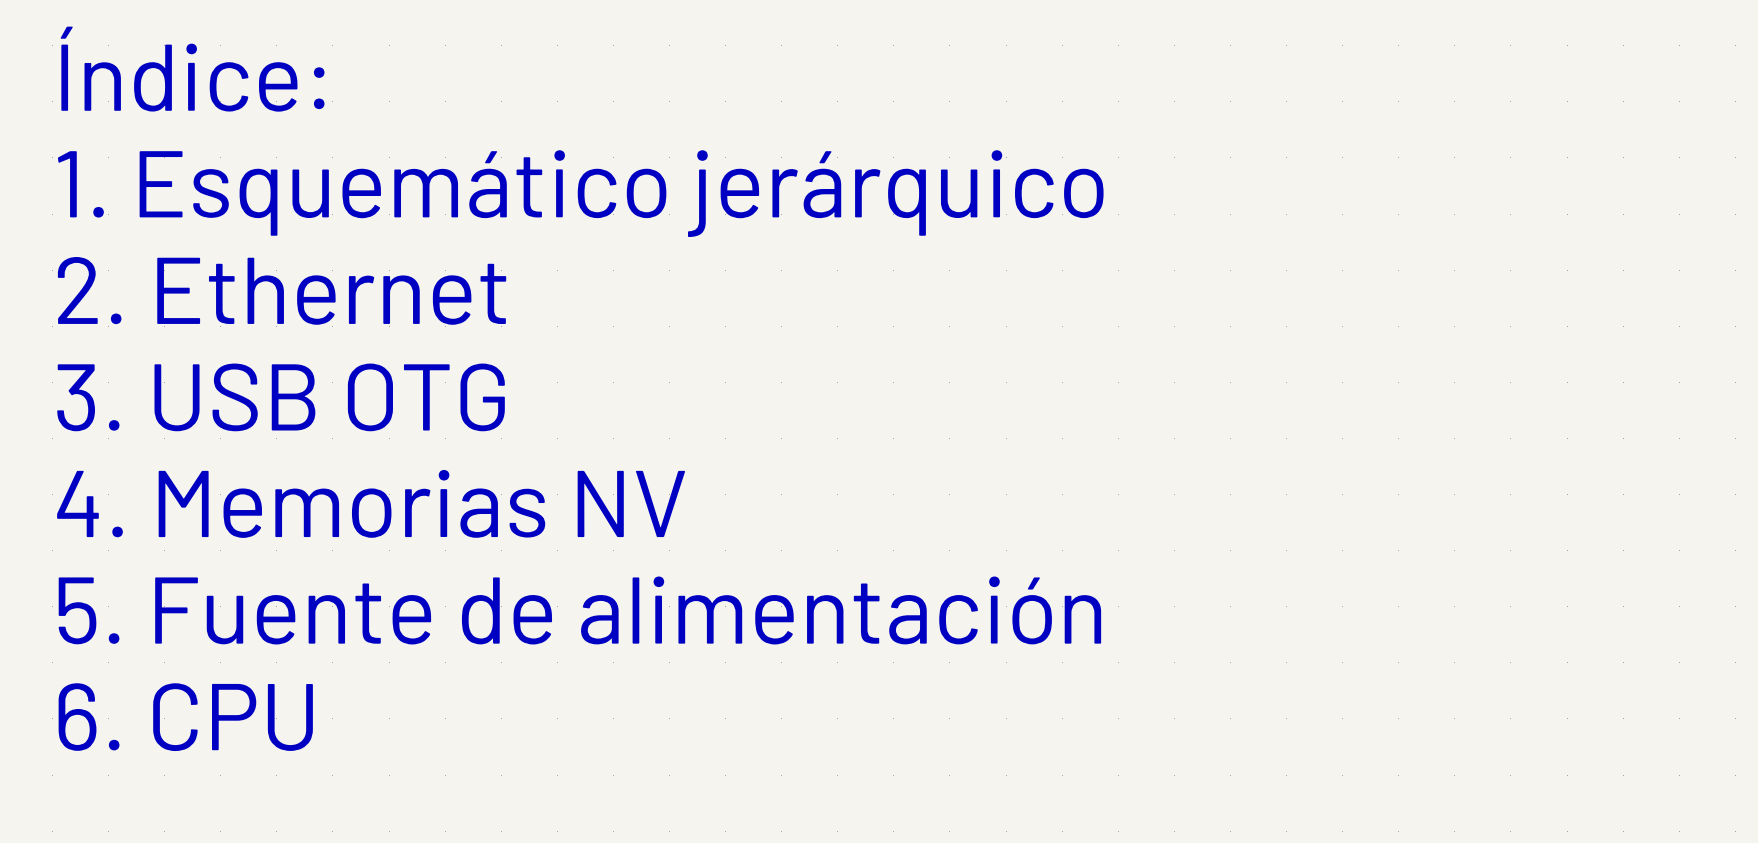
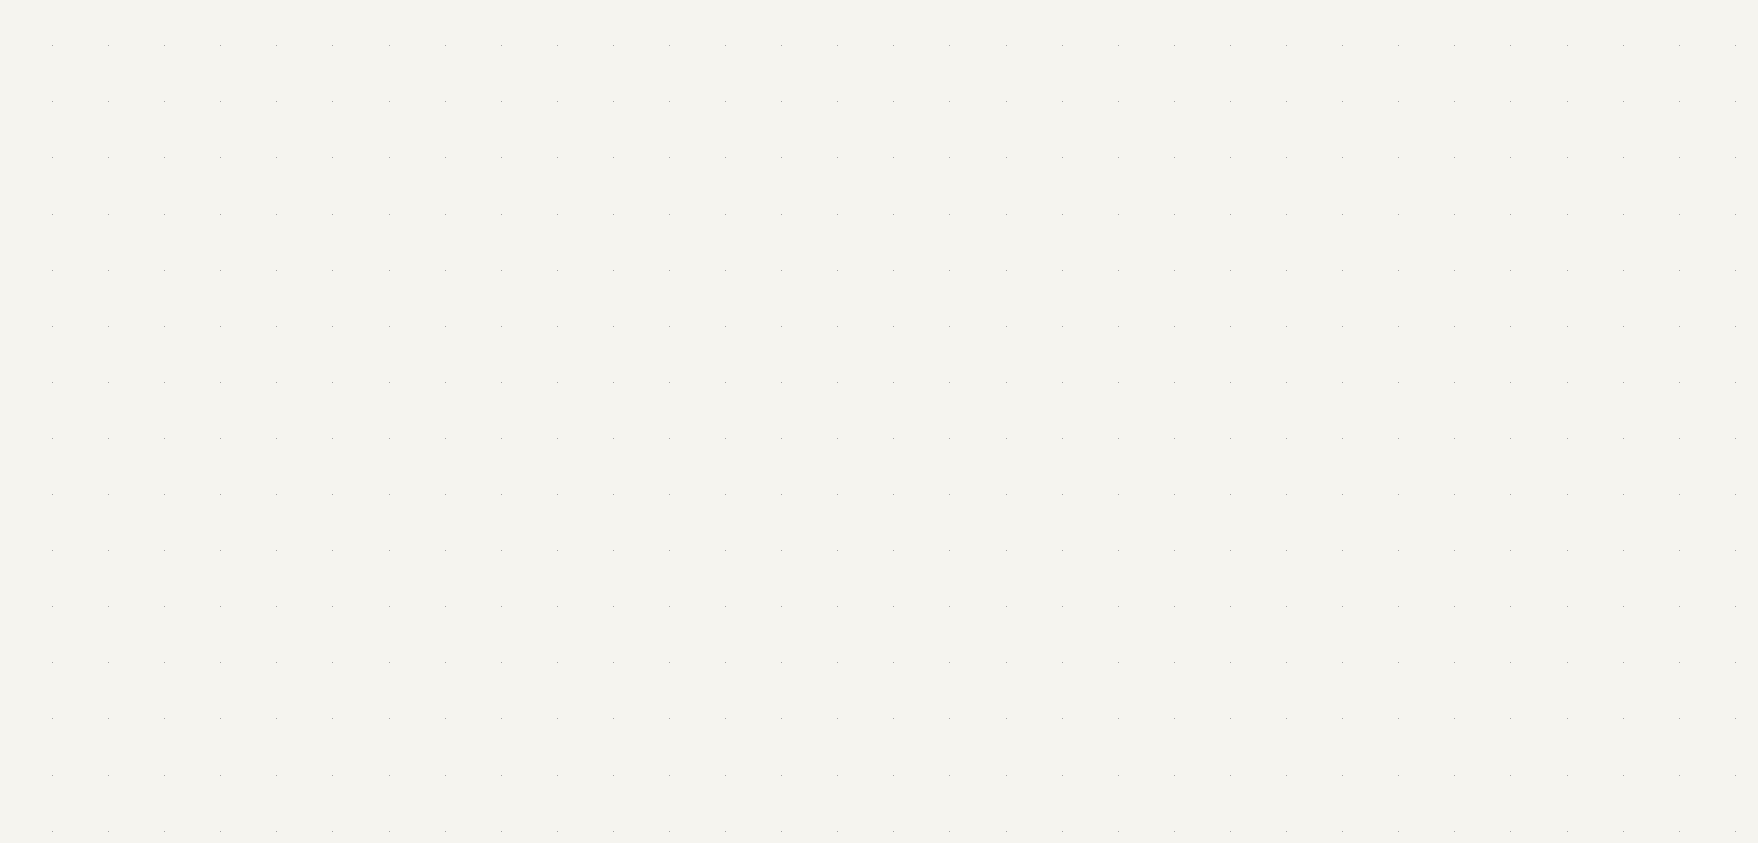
text: Índice: (192, 69) -> none
text: 1. Esquemático jerárquico (580, 193) -> none
text: 2. Ethernet (282, 290) -> none
text: 3. USB OTG (281, 397) -> none
text: 4. Memorias NV (371, 503) -> none
text: 5. Fuente de alimentación (579, 610) -> none
text: 6. CPU (185, 717) -> none

